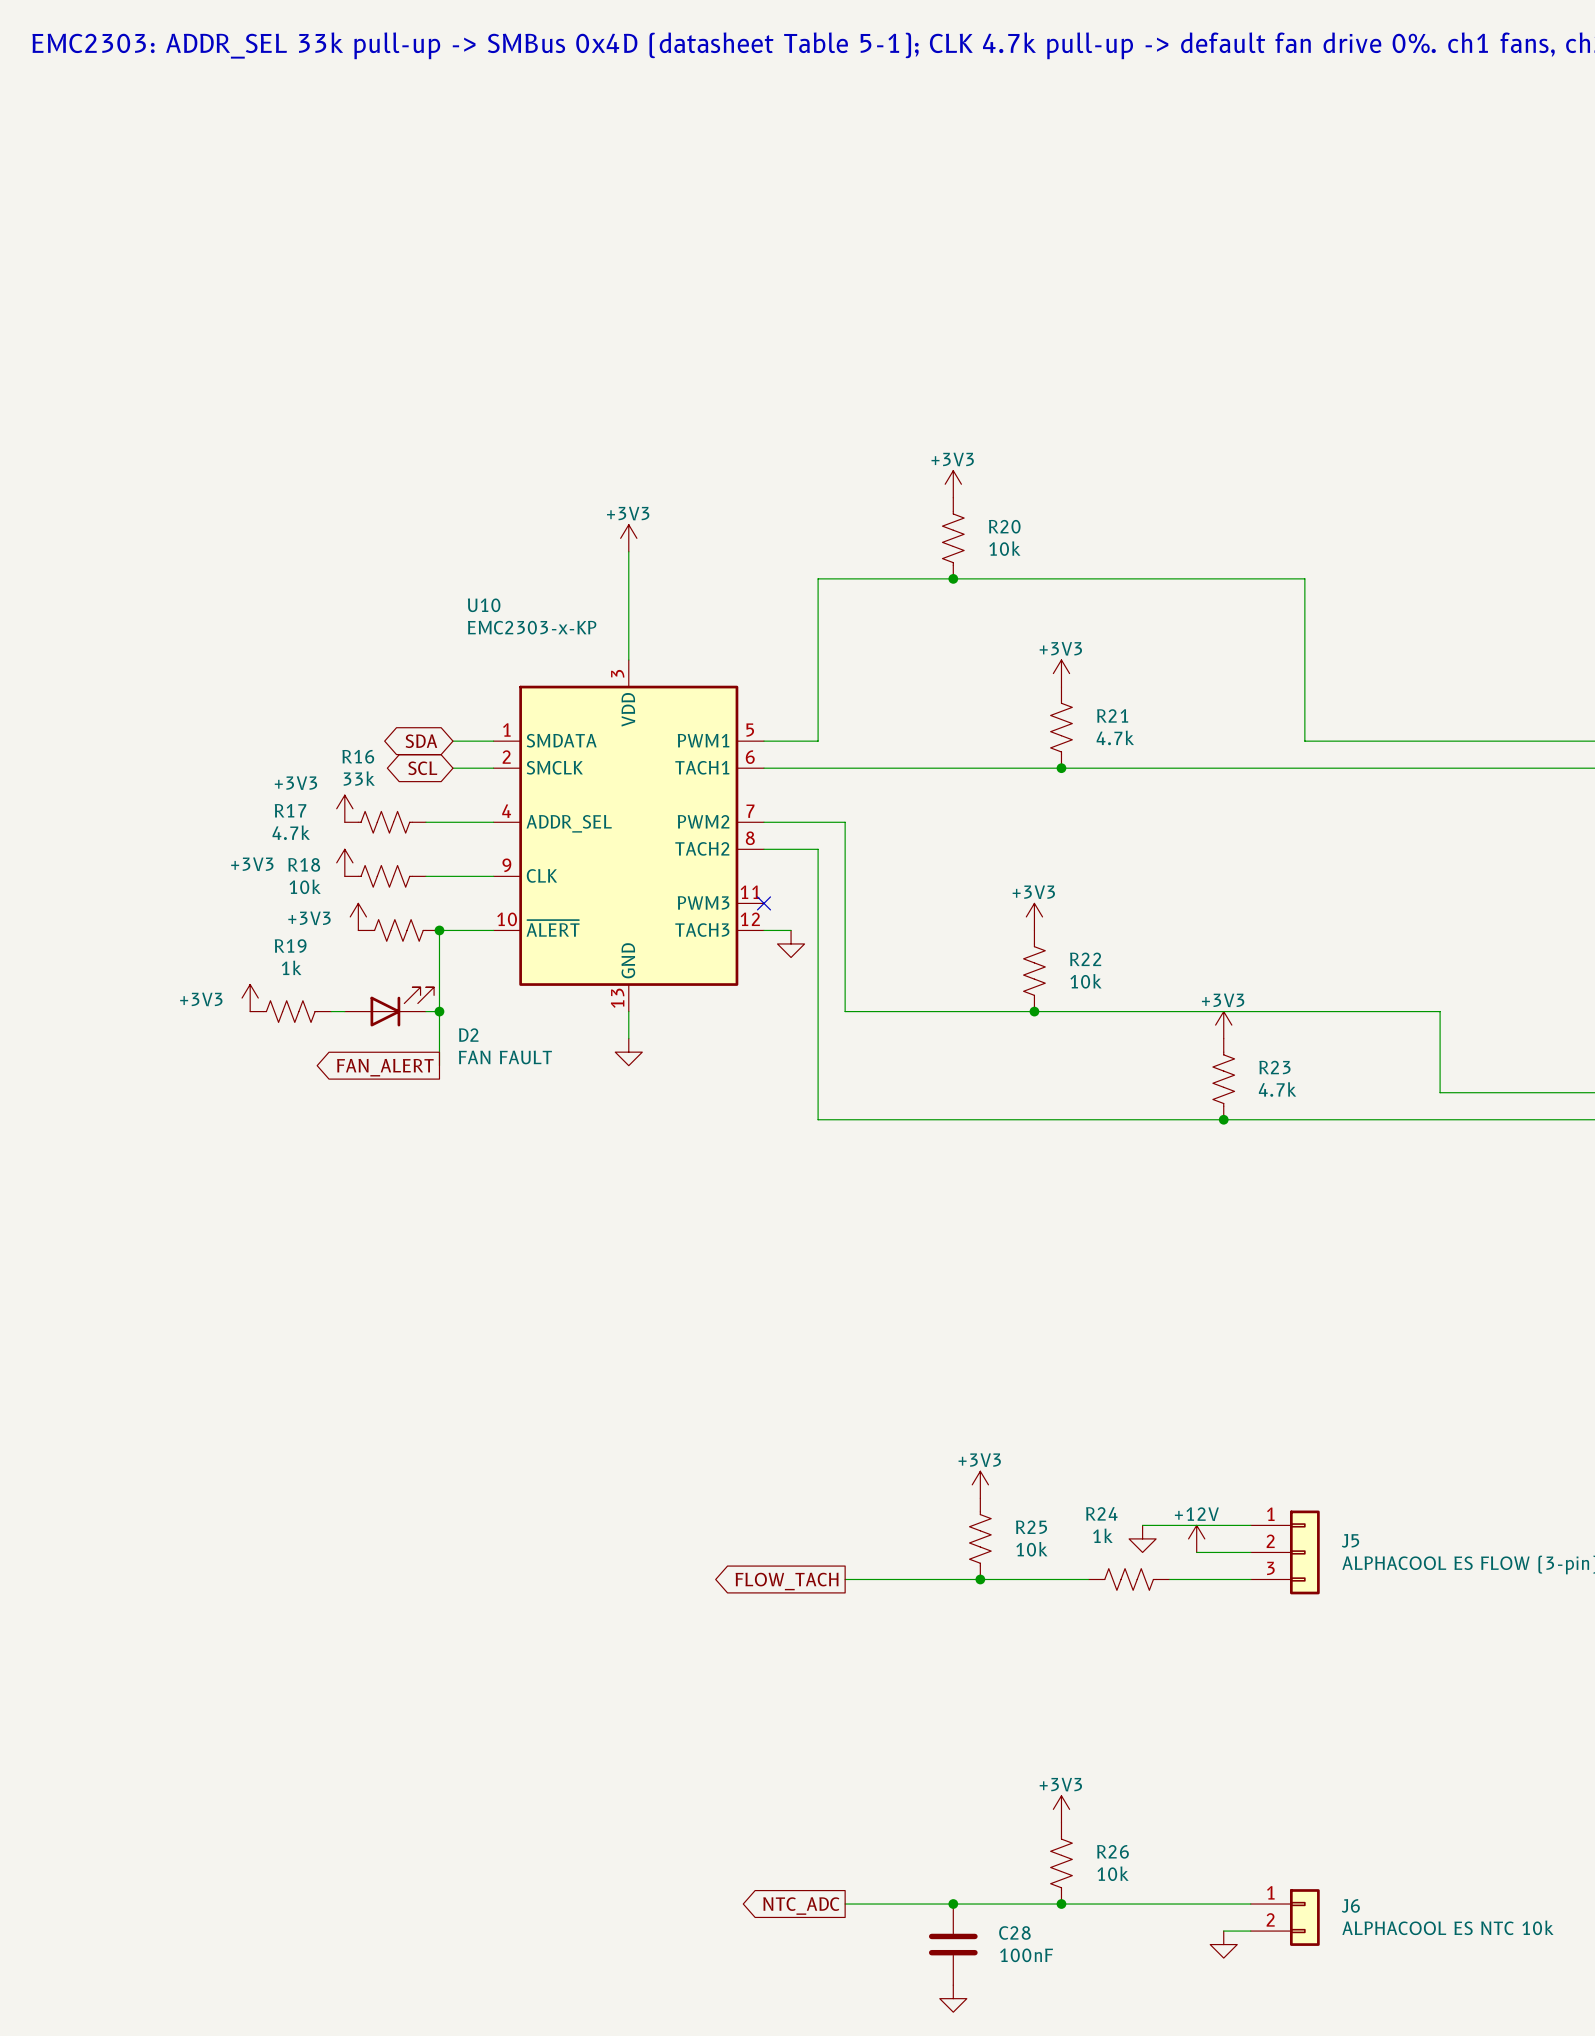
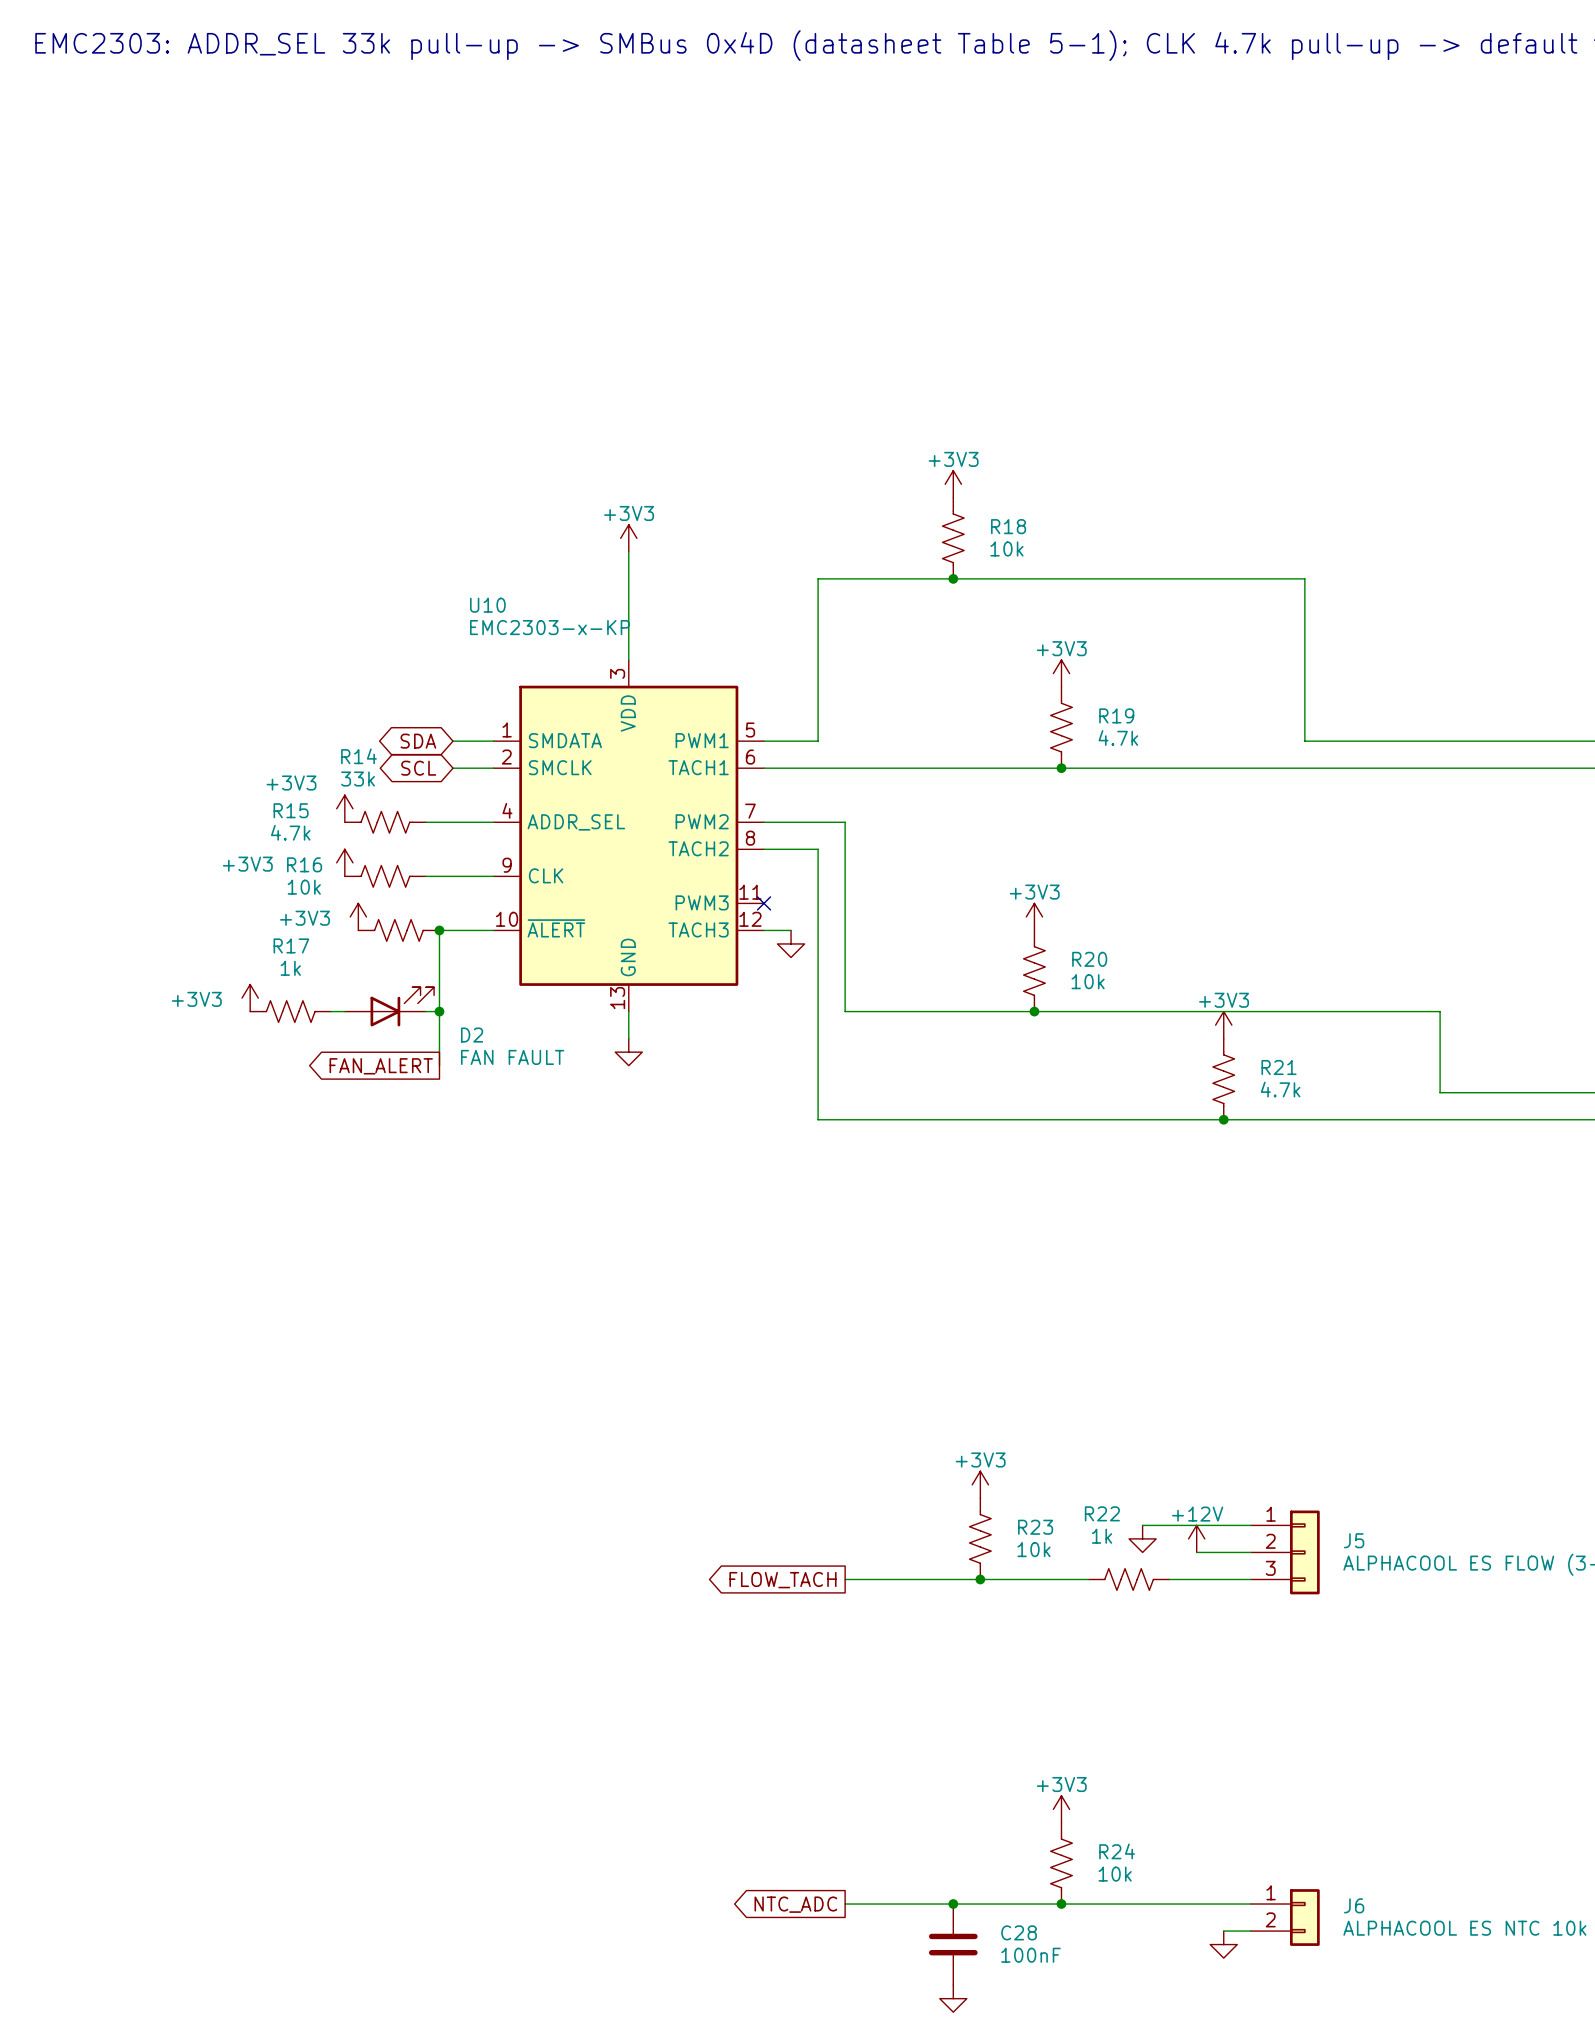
R20 name: R20 (1004, 526) -> R18 (1008, 526)
R21 name: R21 (1112, 715) -> R19 (1116, 715)
R16 name: R16 (358, 756) -> R14 (358, 756)
R17 name: R17 (290, 810) -> R15 (291, 810)
R18 name: R18 (304, 864) -> R16 (304, 864)
R19 name: R19 (290, 946) -> R17 (291, 945)
R22 name: R22 (1085, 959) -> R20 (1089, 959)
R23 name: R23 (1274, 1067) -> R21 (1279, 1067)
R24 name: R24 (1101, 1513) -> R22 (1102, 1513)
R25 name: R25 (1031, 1527) -> R23 (1035, 1527)
R26 name: R26 (1112, 1851) -> R24 (1117, 1851)

